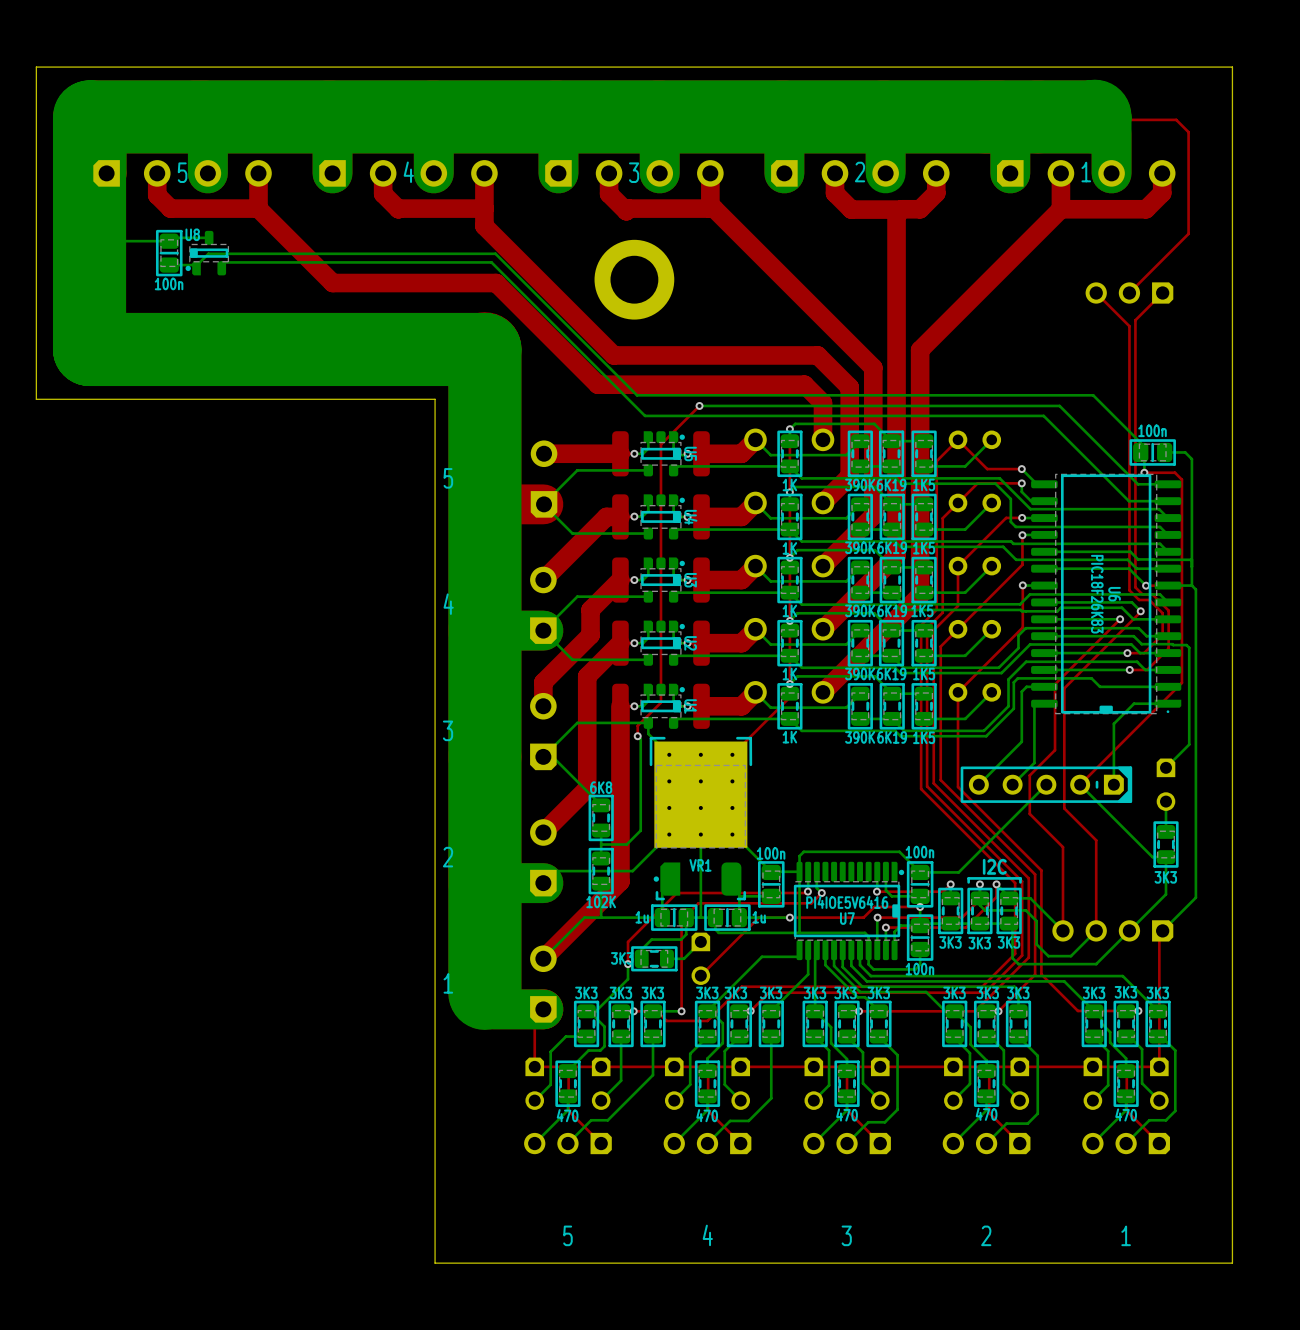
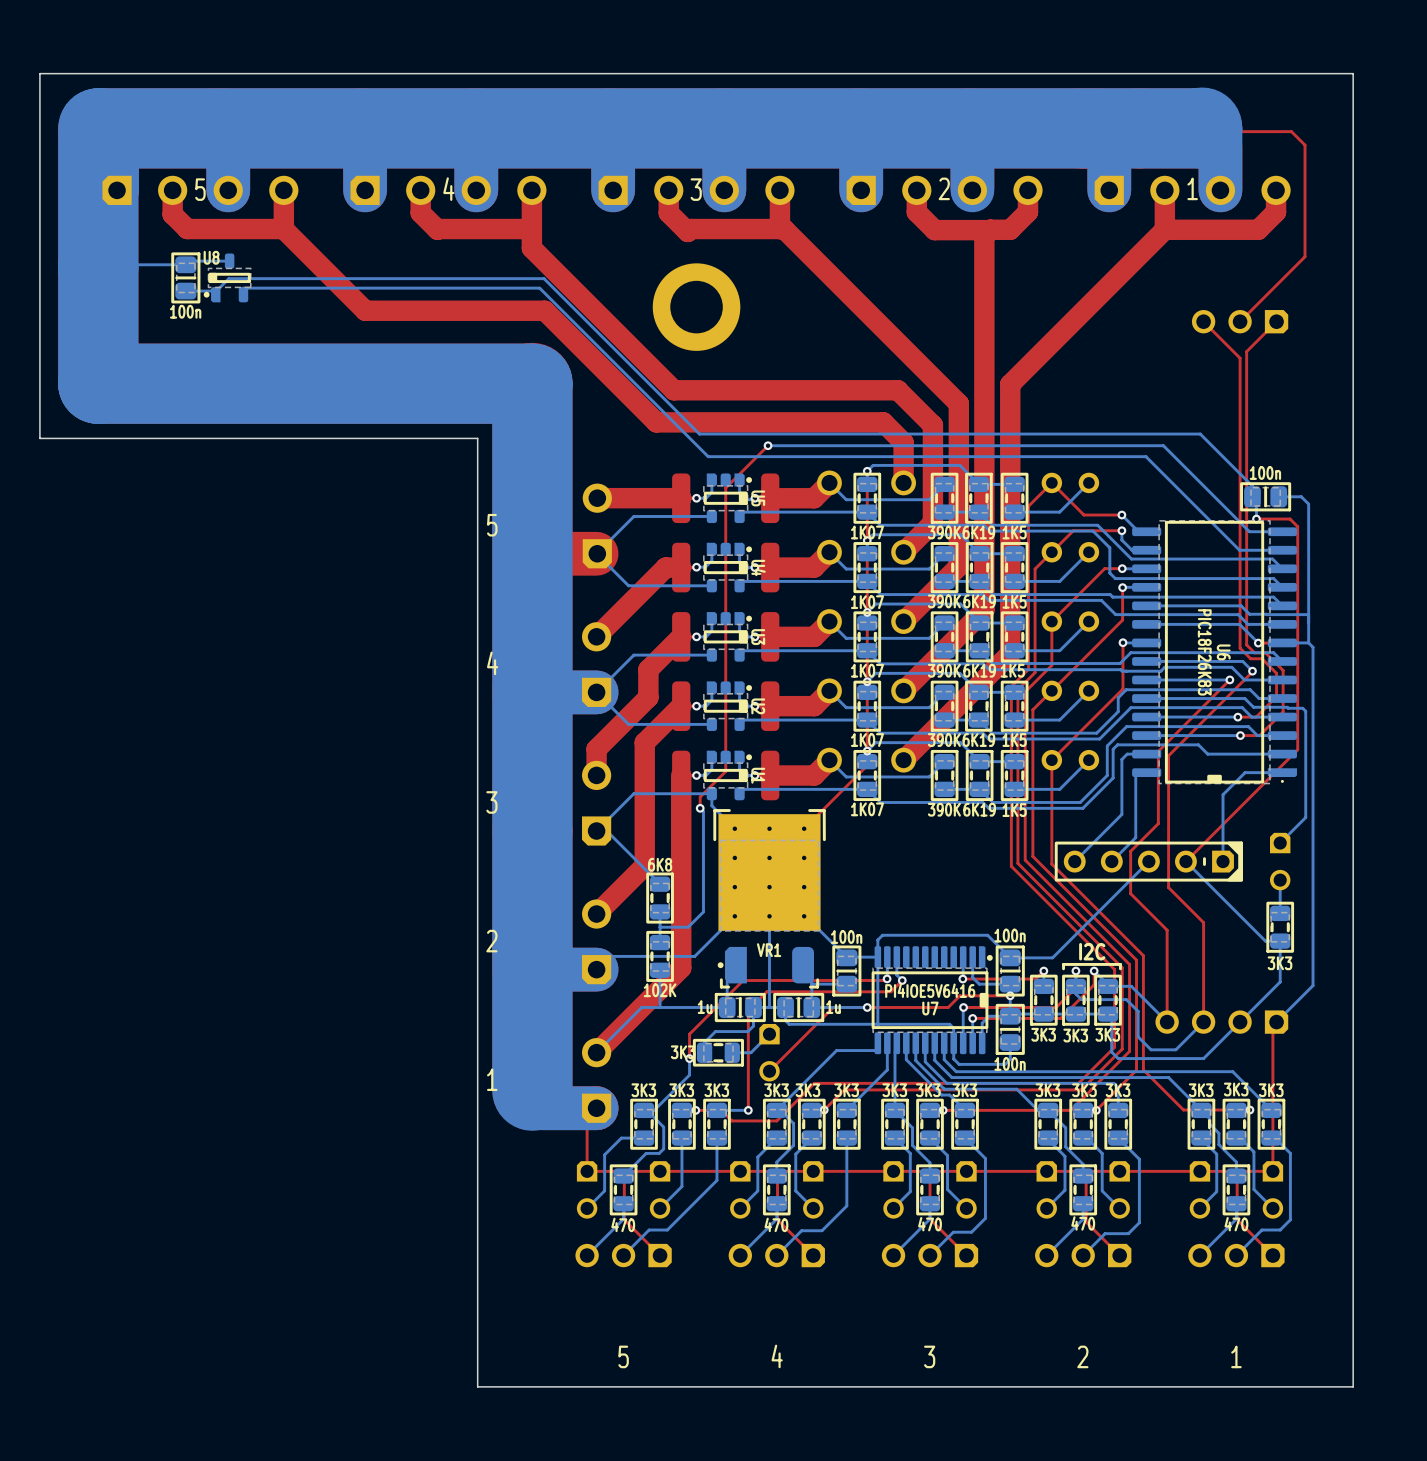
part value: 1K (789, 484) -> 1K07 (867, 532)
part value: 1K (789, 548) -> 1K07 (867, 602)
part value: 1K (789, 610) -> 1K07 (867, 670)
part value: 1K (789, 674) -> 1K07 (867, 740)
part value: 1K (789, 737) -> 1K07 (867, 809)

